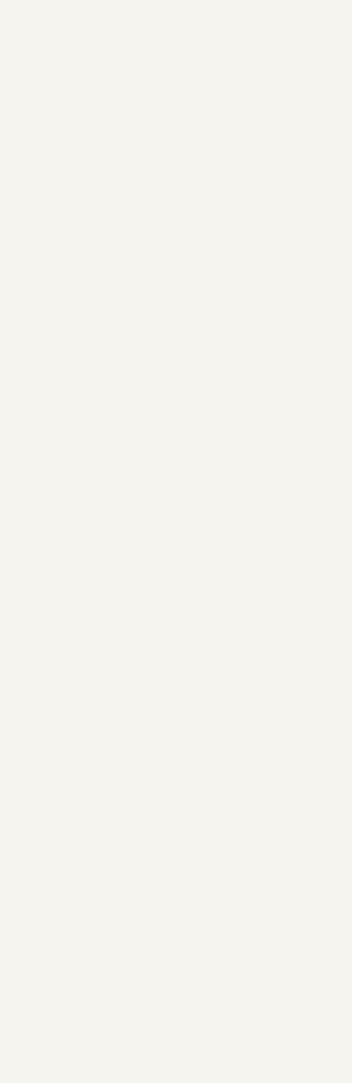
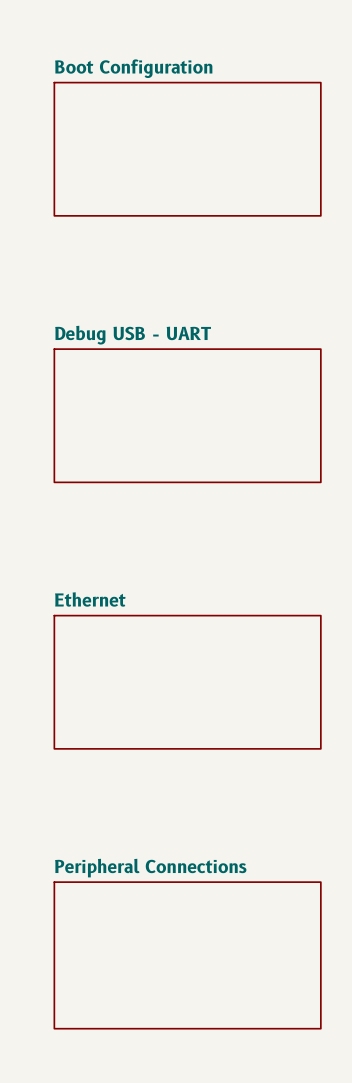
sheet Boot Configuration: none -> (187, 149)
sheet Debug USB - UART: none -> (187, 415)
sheet Ethernet: none -> (187, 682)
sheet Peripheral Connections: none -> (187, 955)

